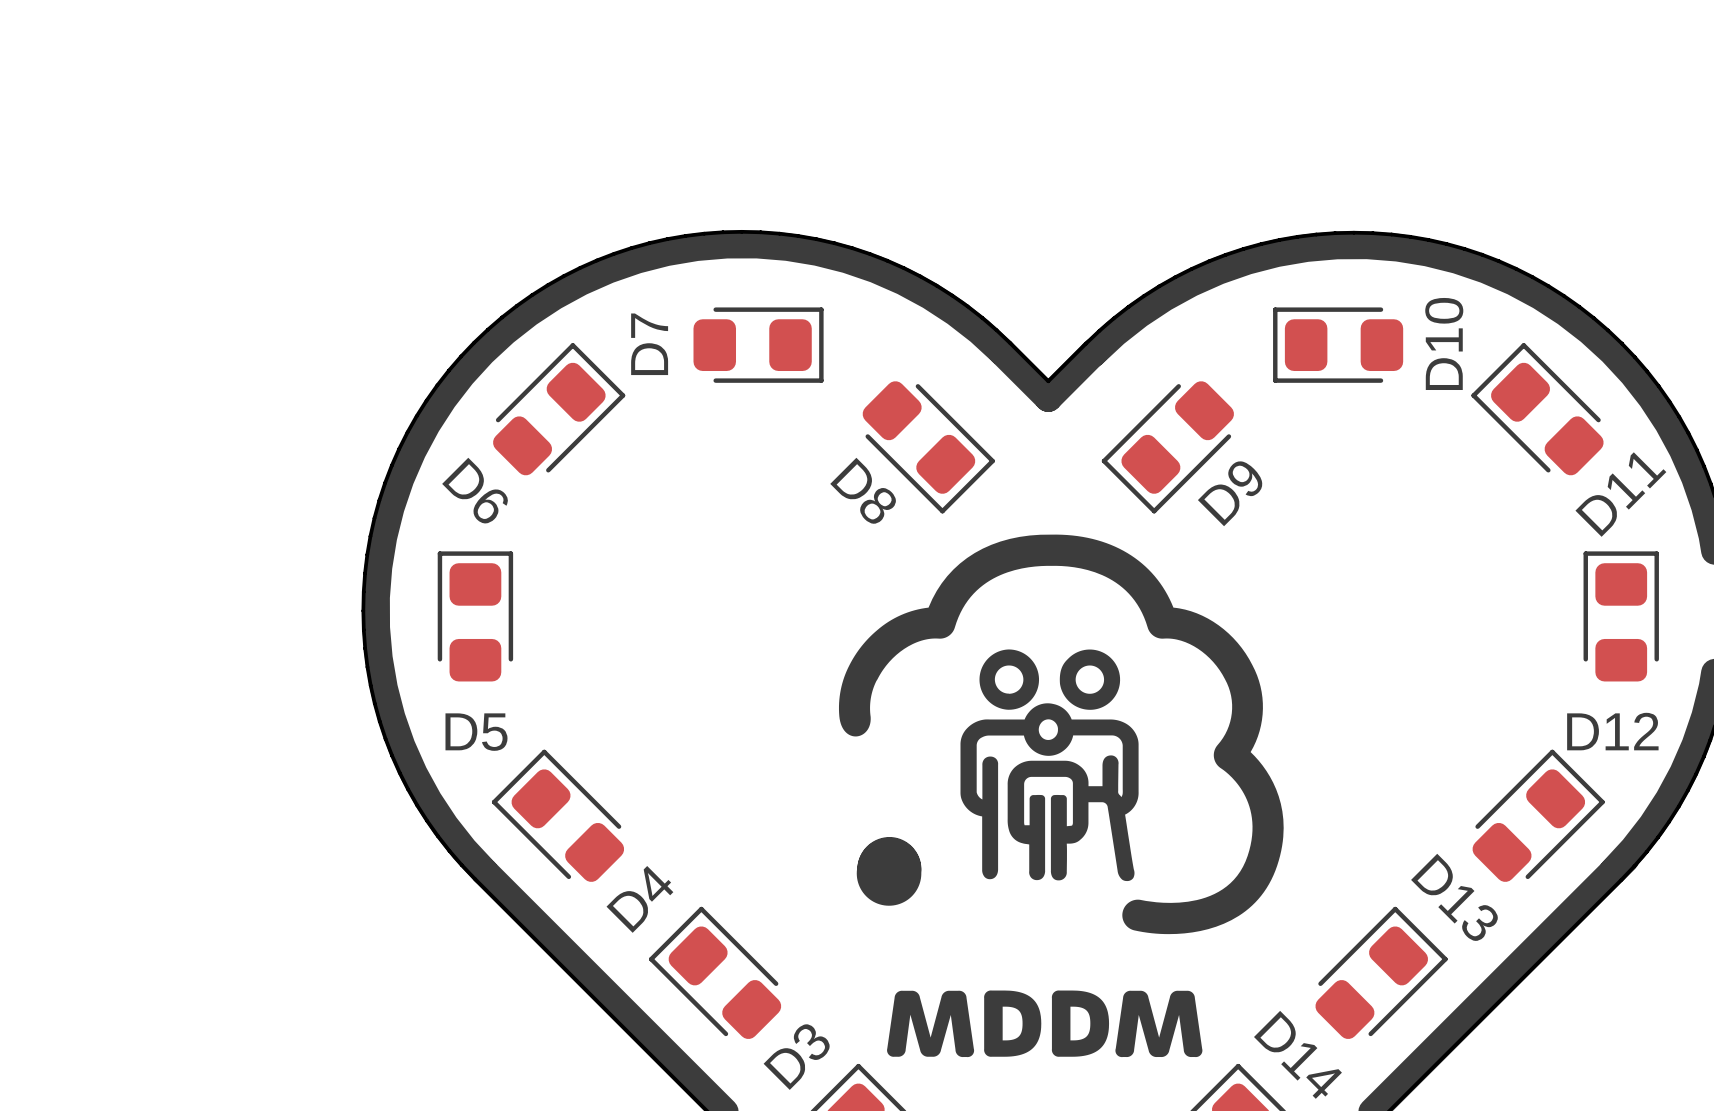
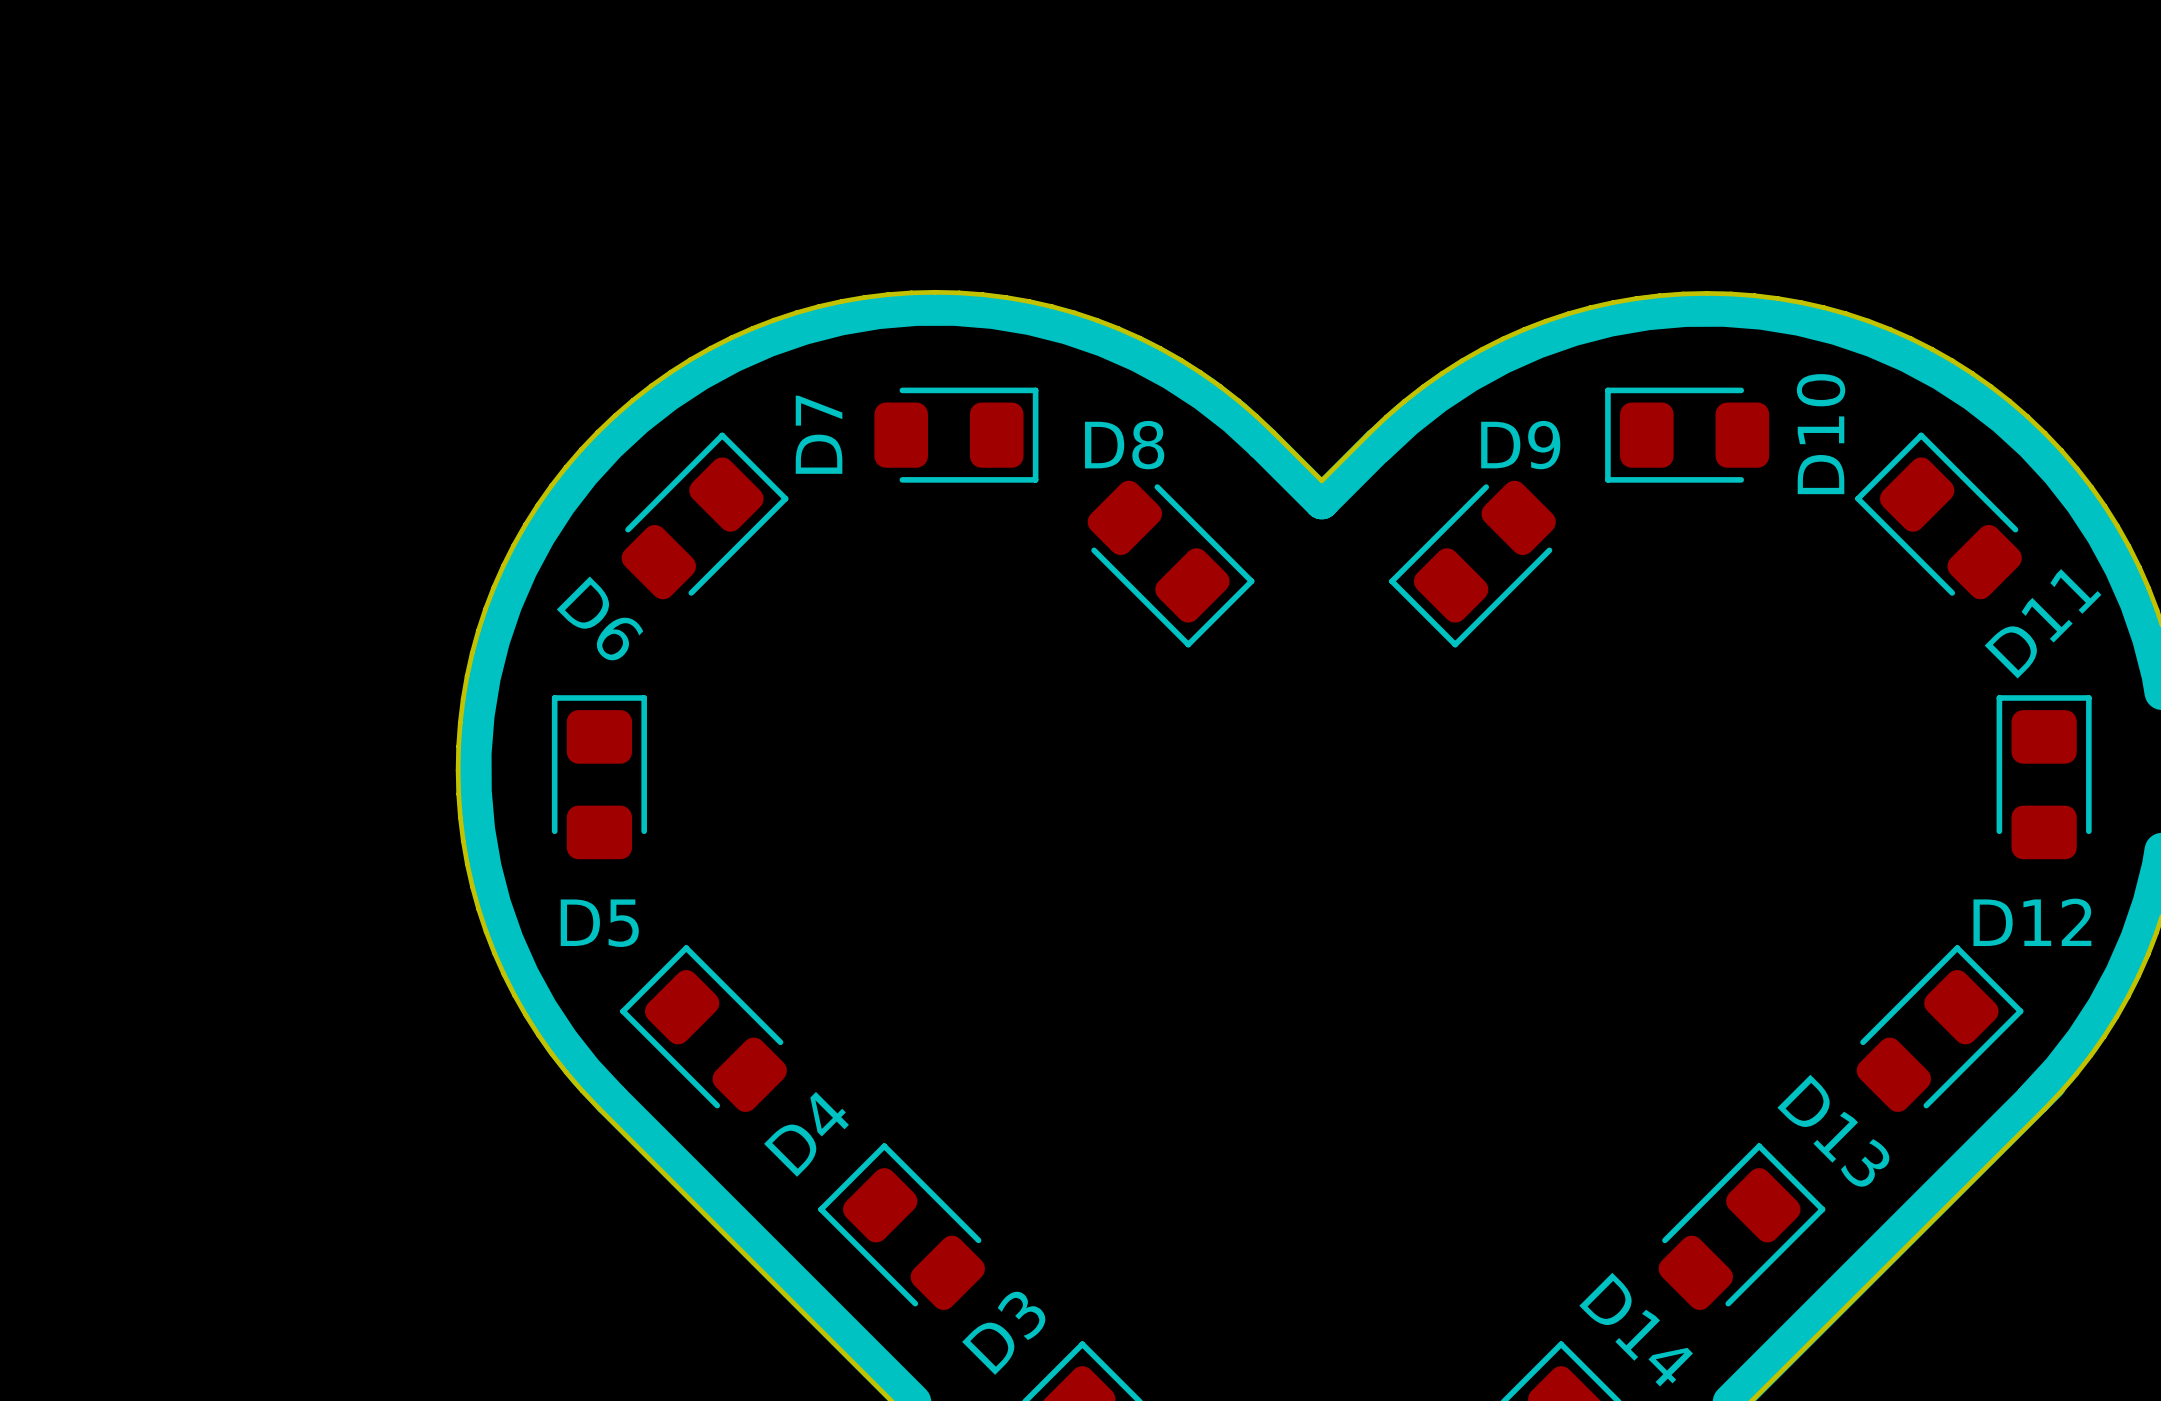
D8 name rotation: 0° (863, 490) -> 45° counterclockwise (1124, 445)
D8 name position: D8 (863, 490) -> D8 (1124, 445)
D9 name rotation: 0° (1230, 493) -> 45° clockwise (1520, 445)
D9 name position: D9 (1230, 493) -> D9 (1520, 445)
drawing: [838, 534, 1284, 935] -> none
drawing: [887, 990, 1203, 1058] -> none

